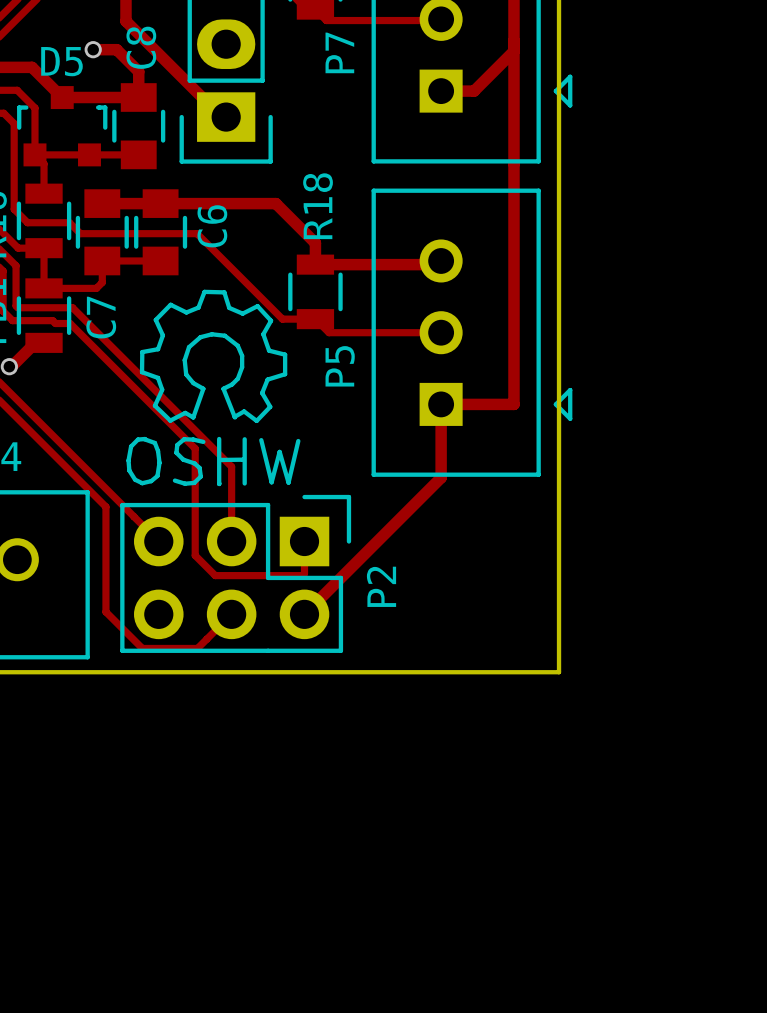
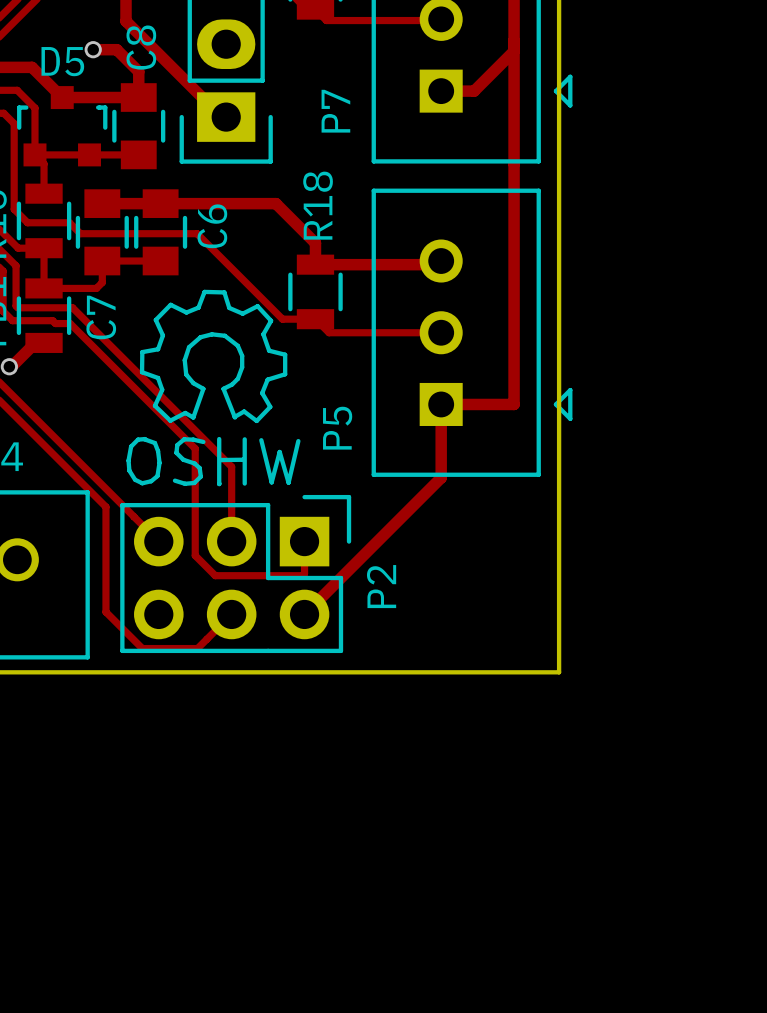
P7 name position: P7 (339, 52) -> P7 (335, 111)
P5 name position: P5 (340, 366) -> P5 (337, 428)

